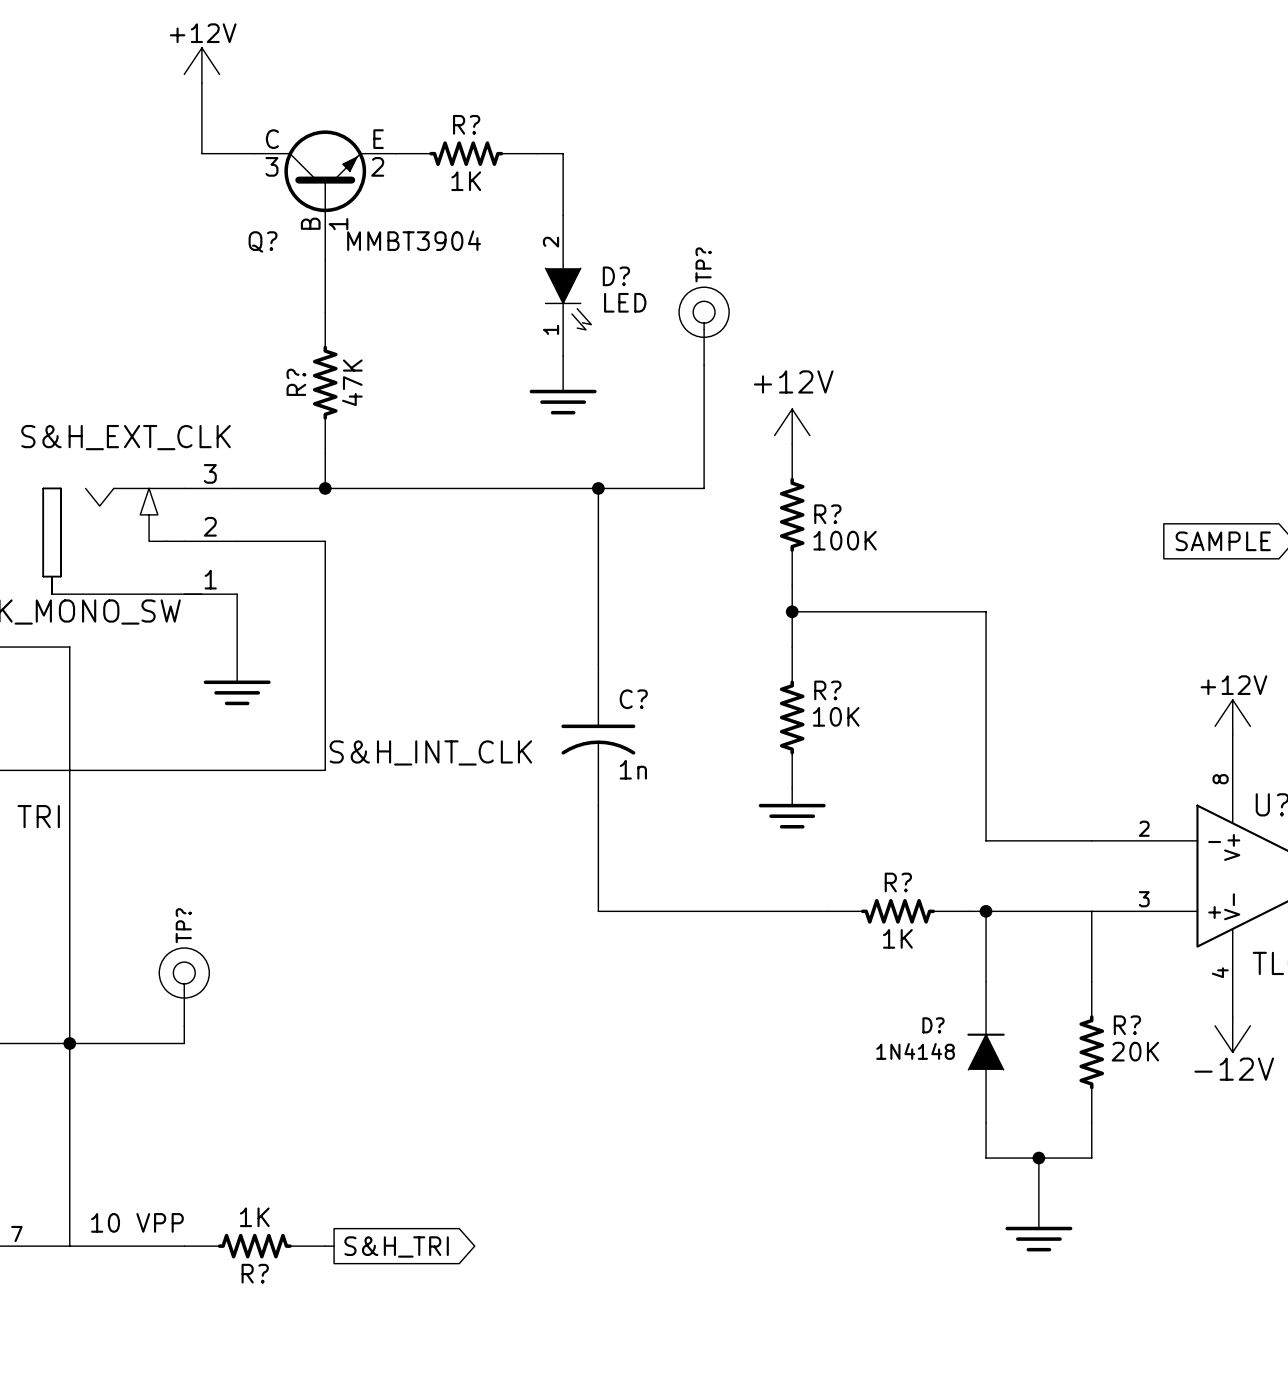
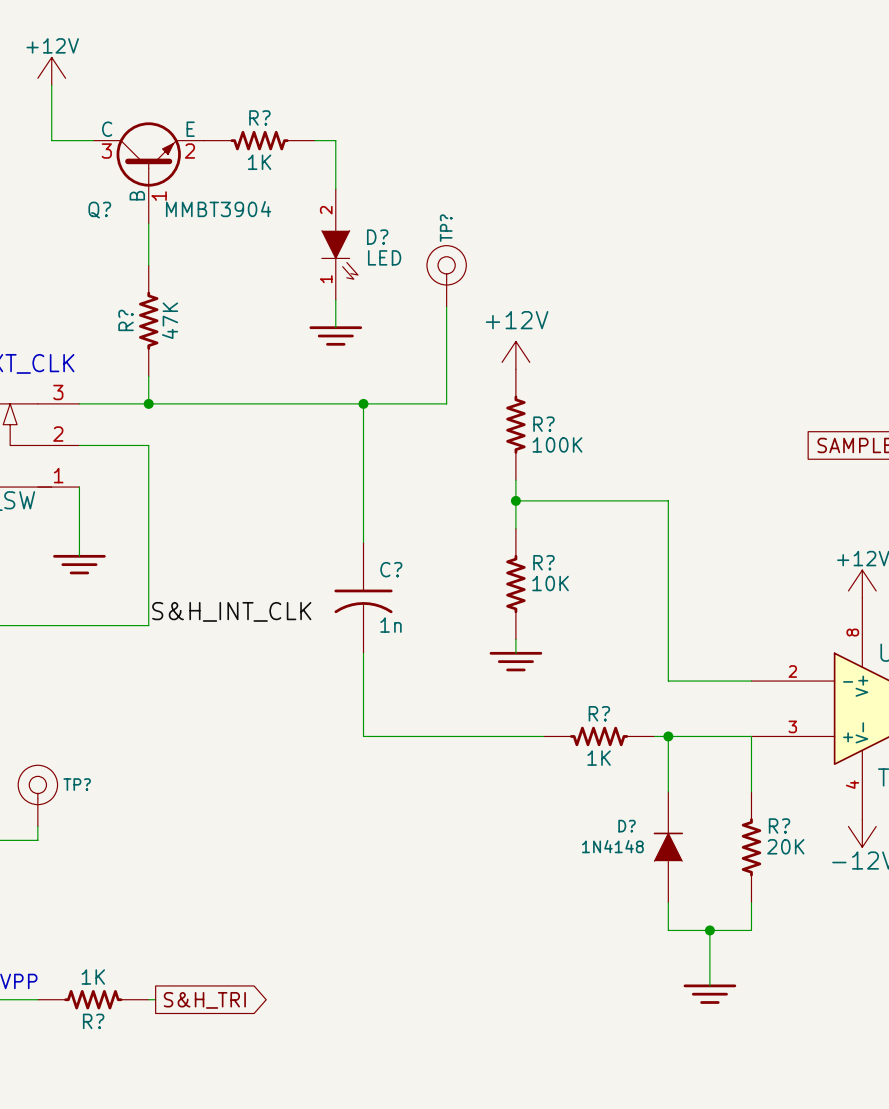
TP? name rotation: 0° (183, 925) -> 90° clockwise (77, 784)
TP? name position: TP? (183, 925) -> TP? (77, 784)

